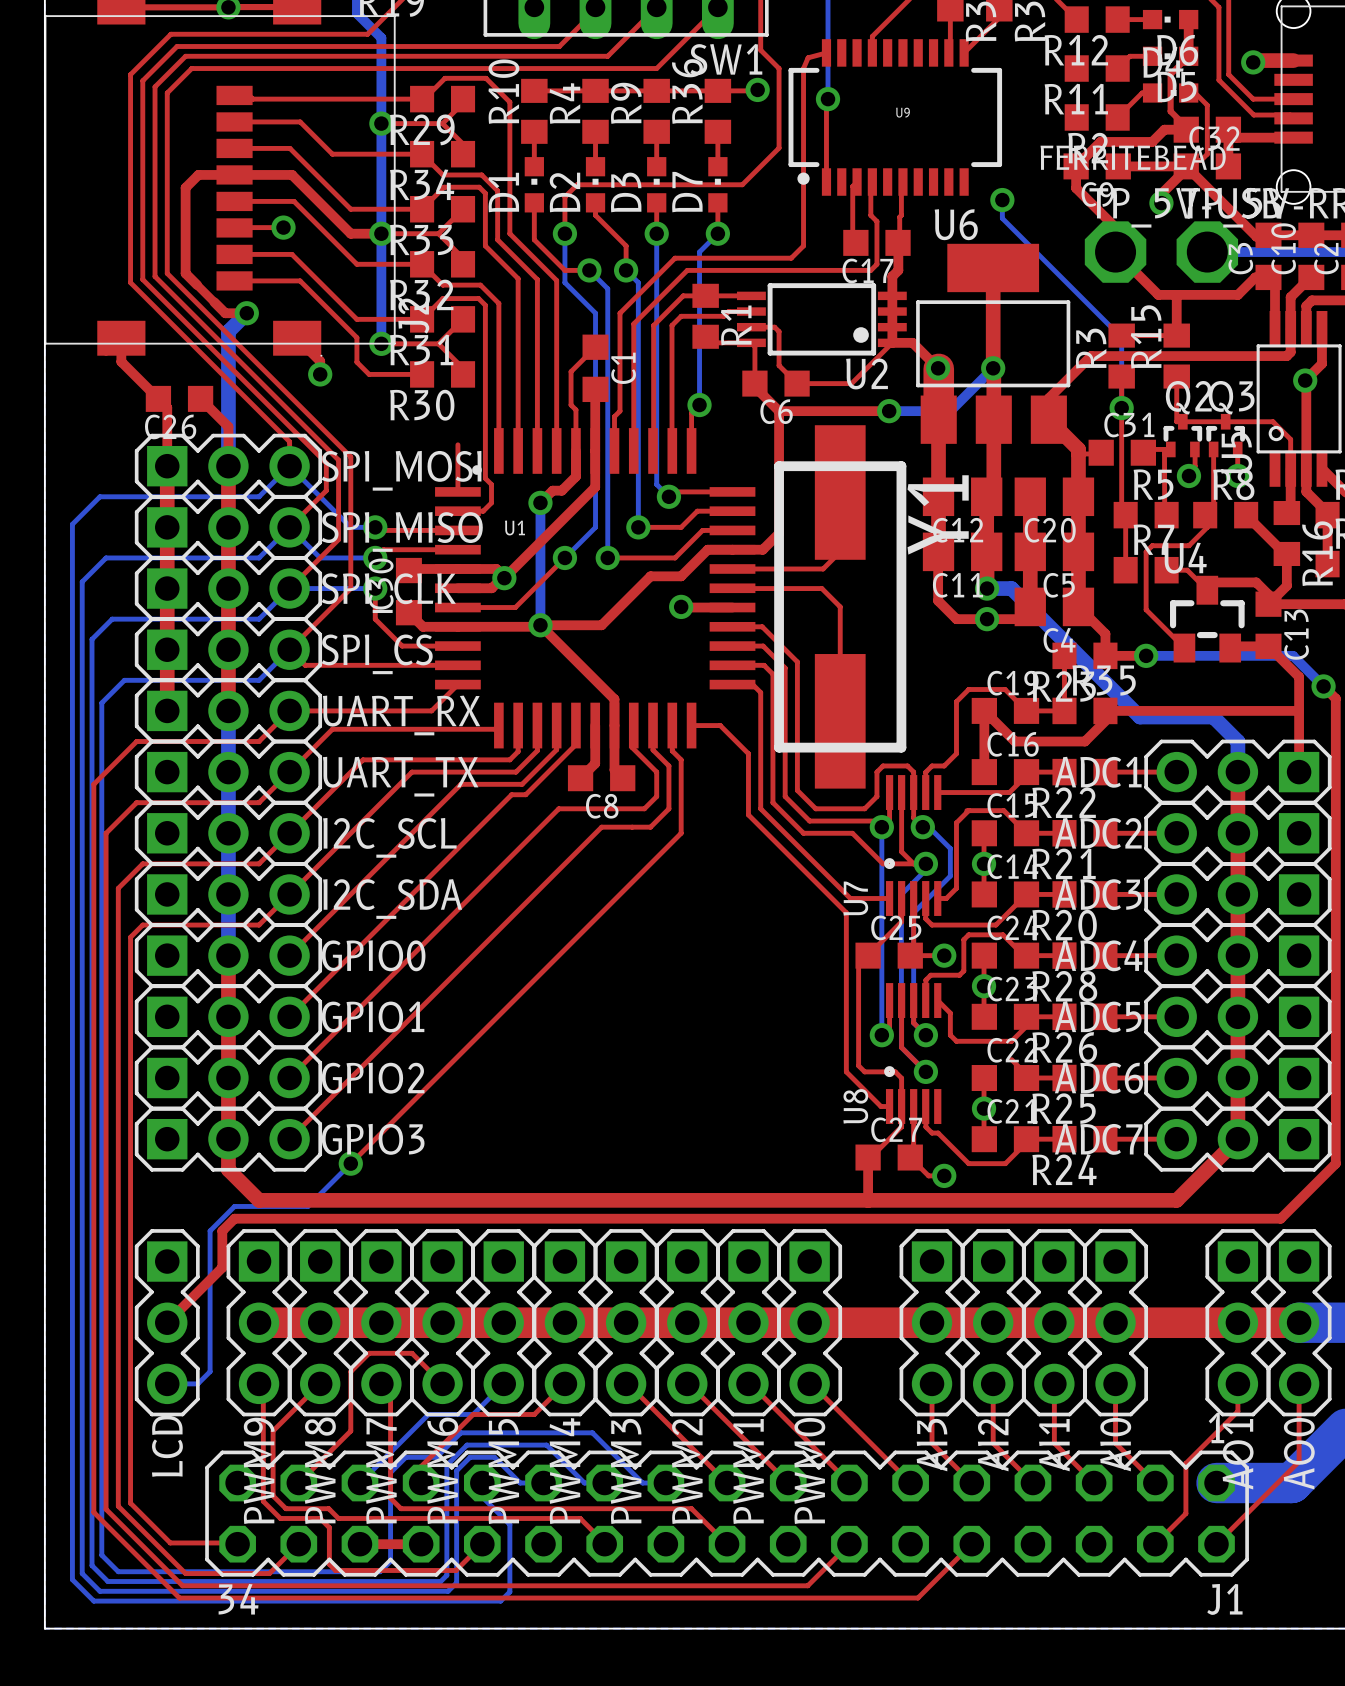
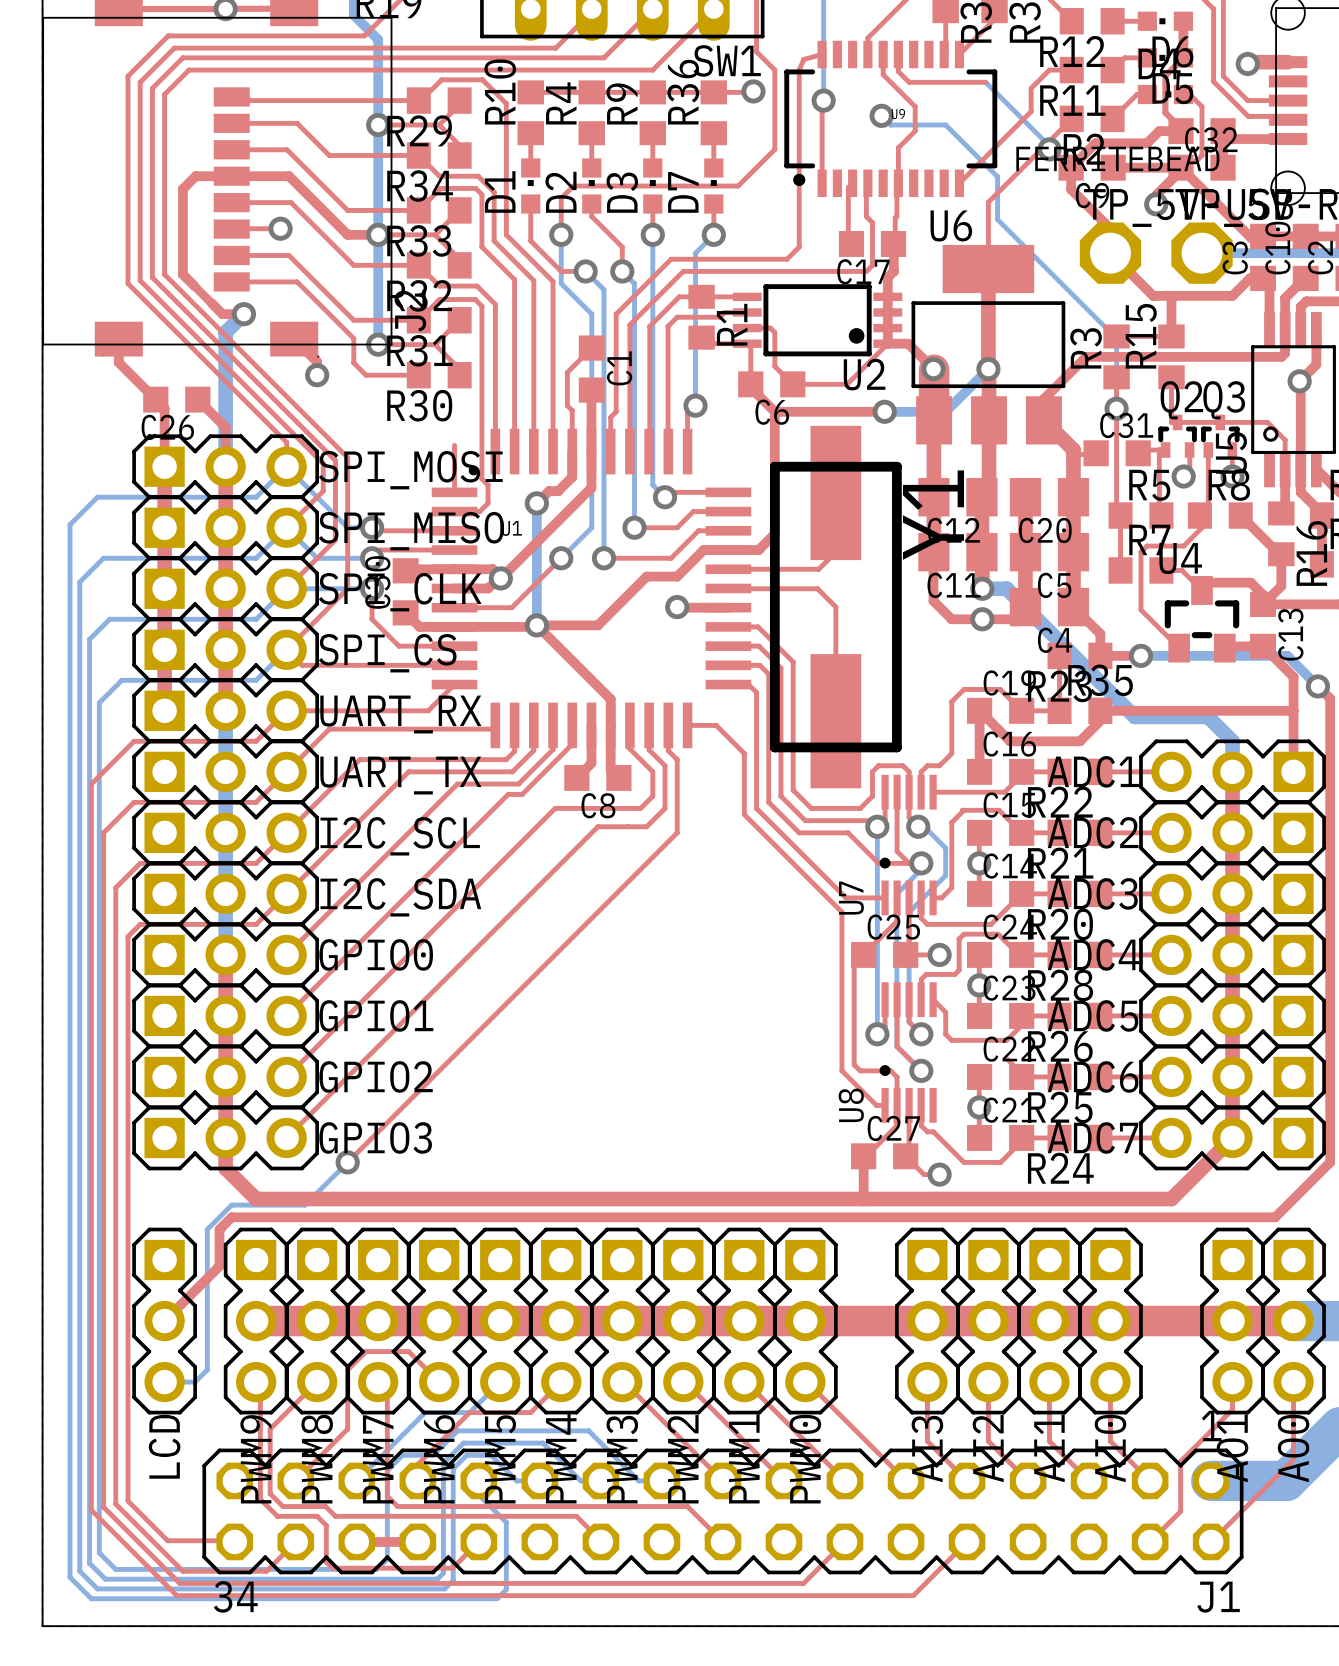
top track: none -> (883, 54) (883, 74) (915, 106) (915, 131) (898, 147) (898, 183)
top track: none -> (898, 54) (898, 71) (909, 82) (985, 82)
top track: none -> (1071, 70) (1049, 70) (1031, 88) (1031, 111) (959, 183)
bottom track: none -> (985, 82) (1049, 146) (1049, 149)
bottom track: none -> (881, 115) (890, 125) (945, 125) (997, 176) (997, 201)
via: none -> (881, 115)
top track: none -> (1071, 118) (988, 202) (988, 269)
via: none -> (1049, 149)
via: (1002, 200) -> none

